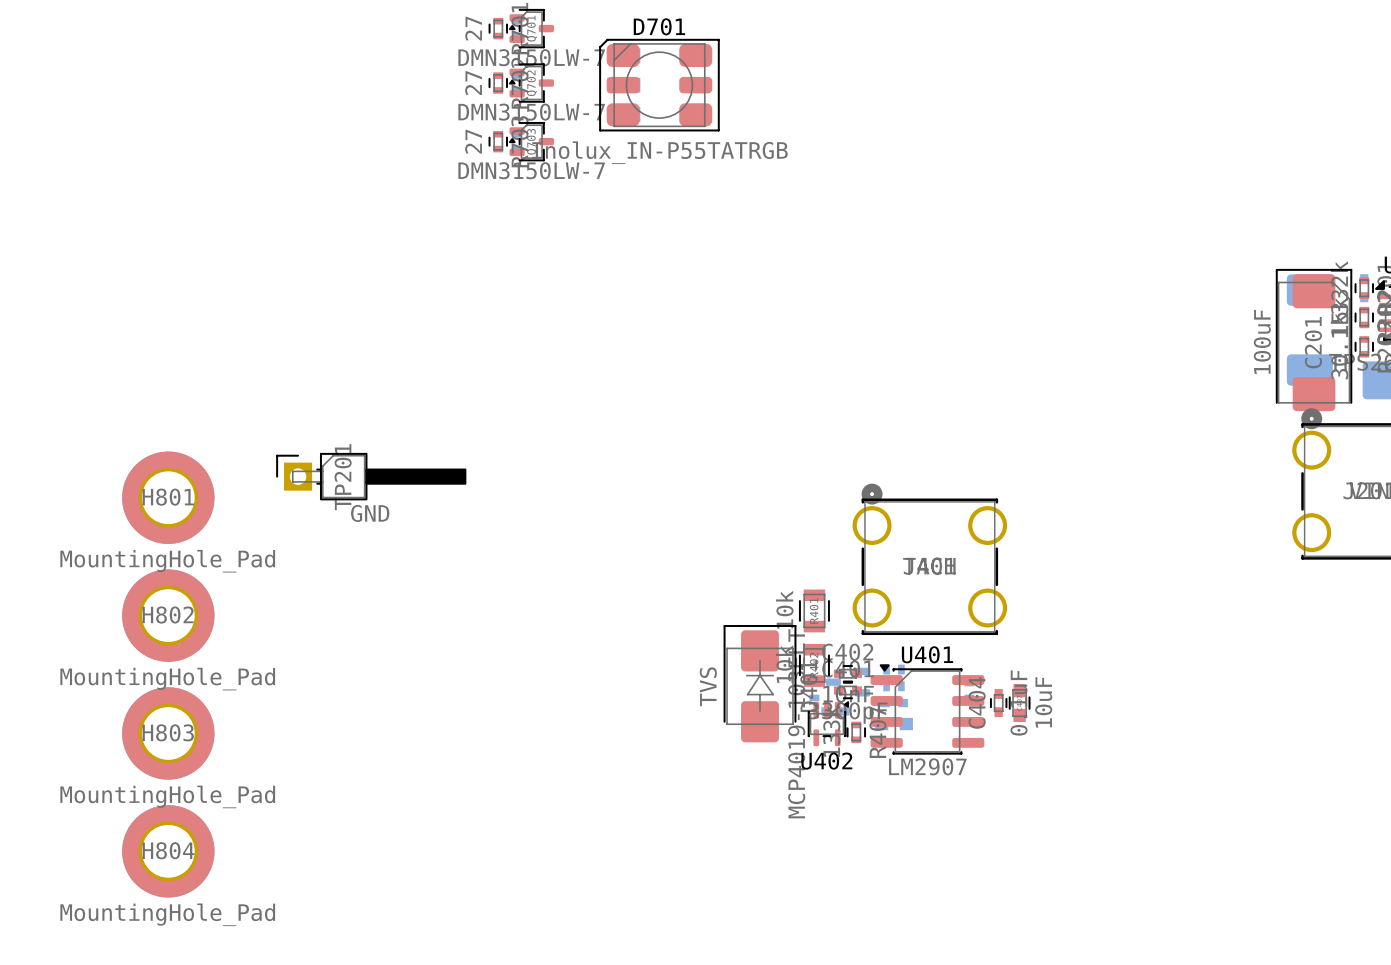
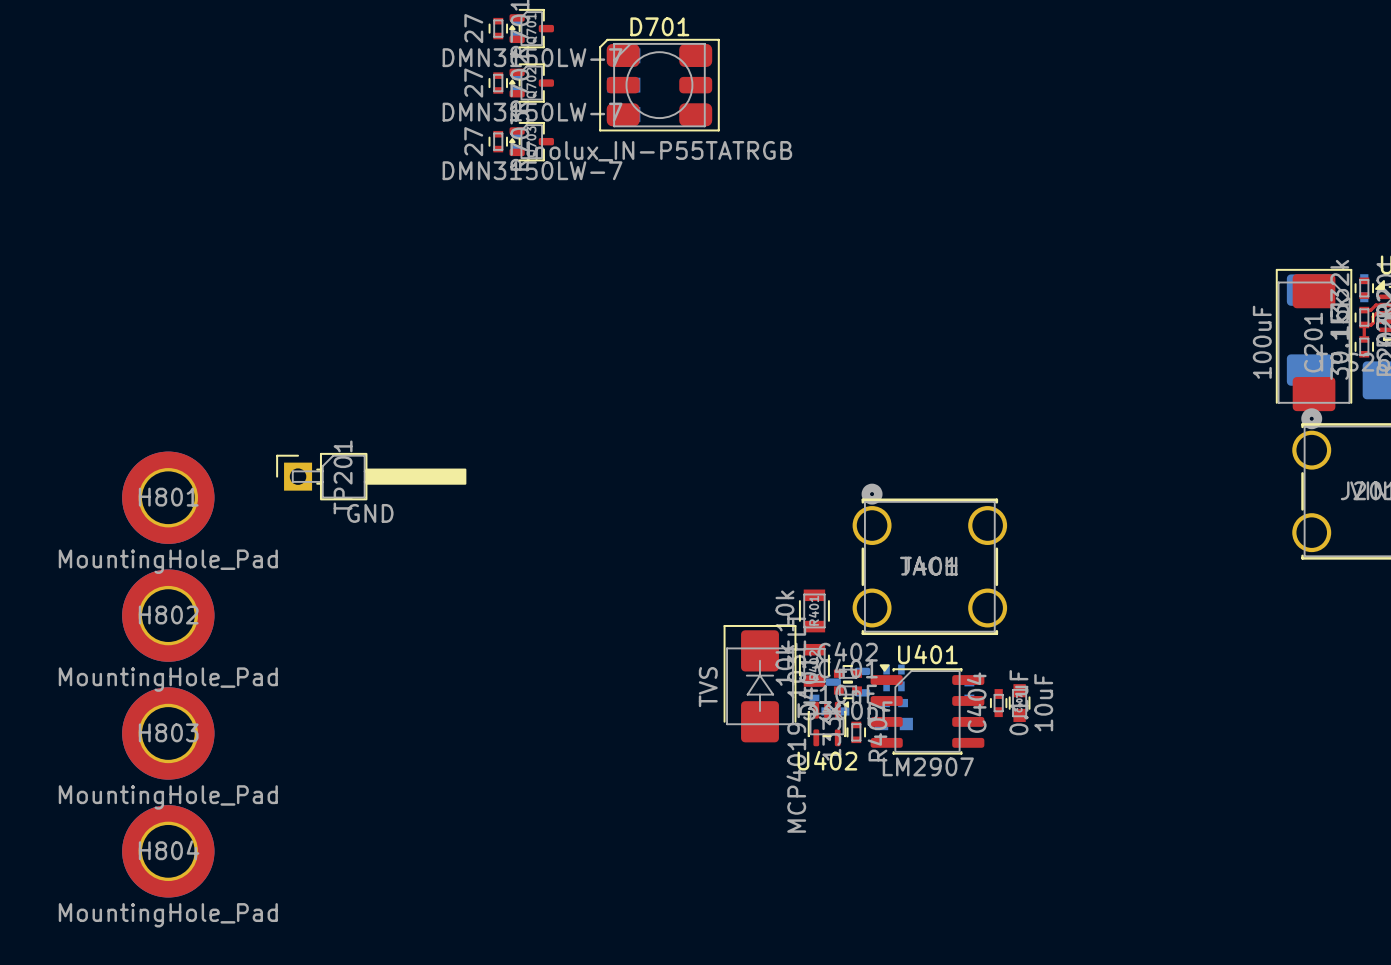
top track: none -> (1386, 305) (1375, 305) (1370, 310) (1364, 310)
top track: none -> (1386, 313) (1376, 313) (1373, 316) (1371, 324) (1364, 324) (1364, 339)

